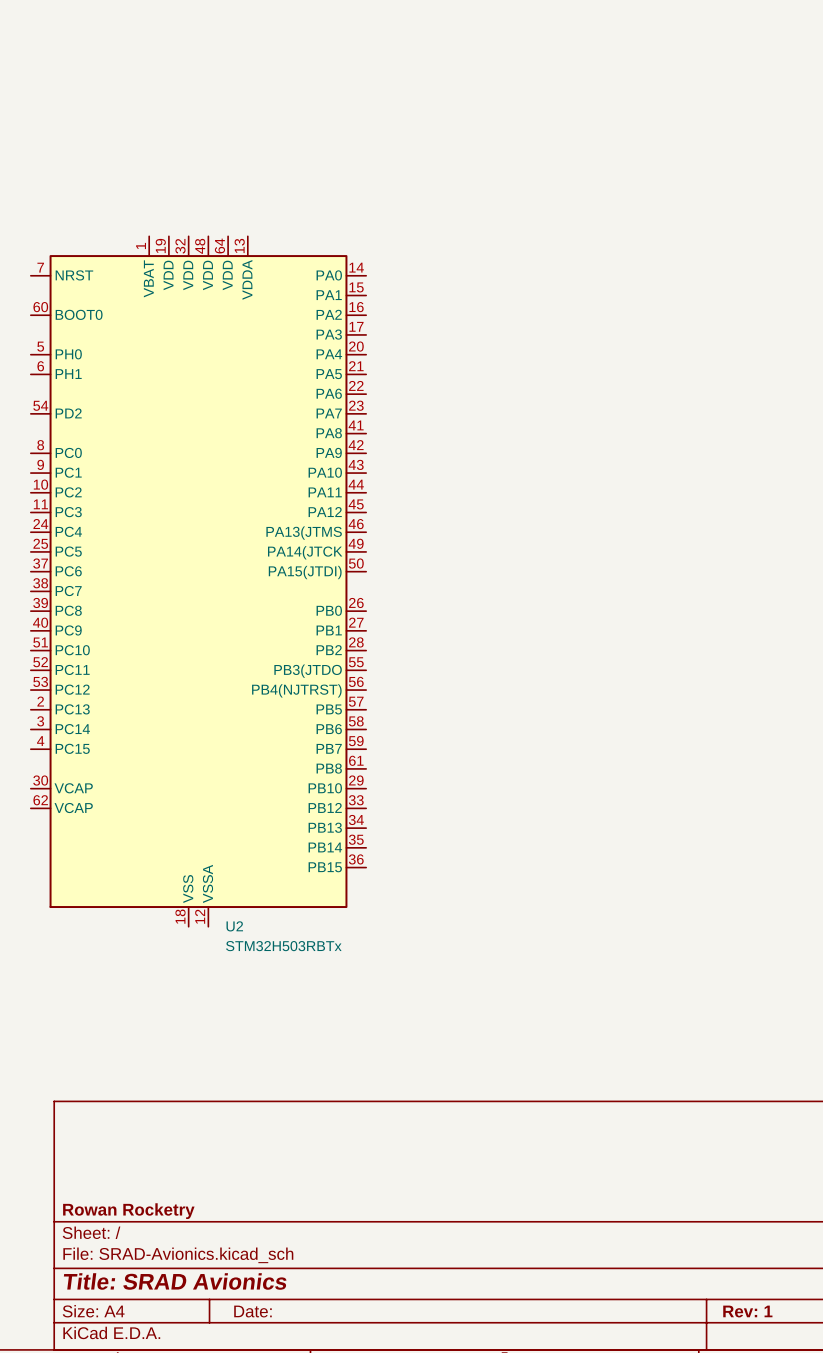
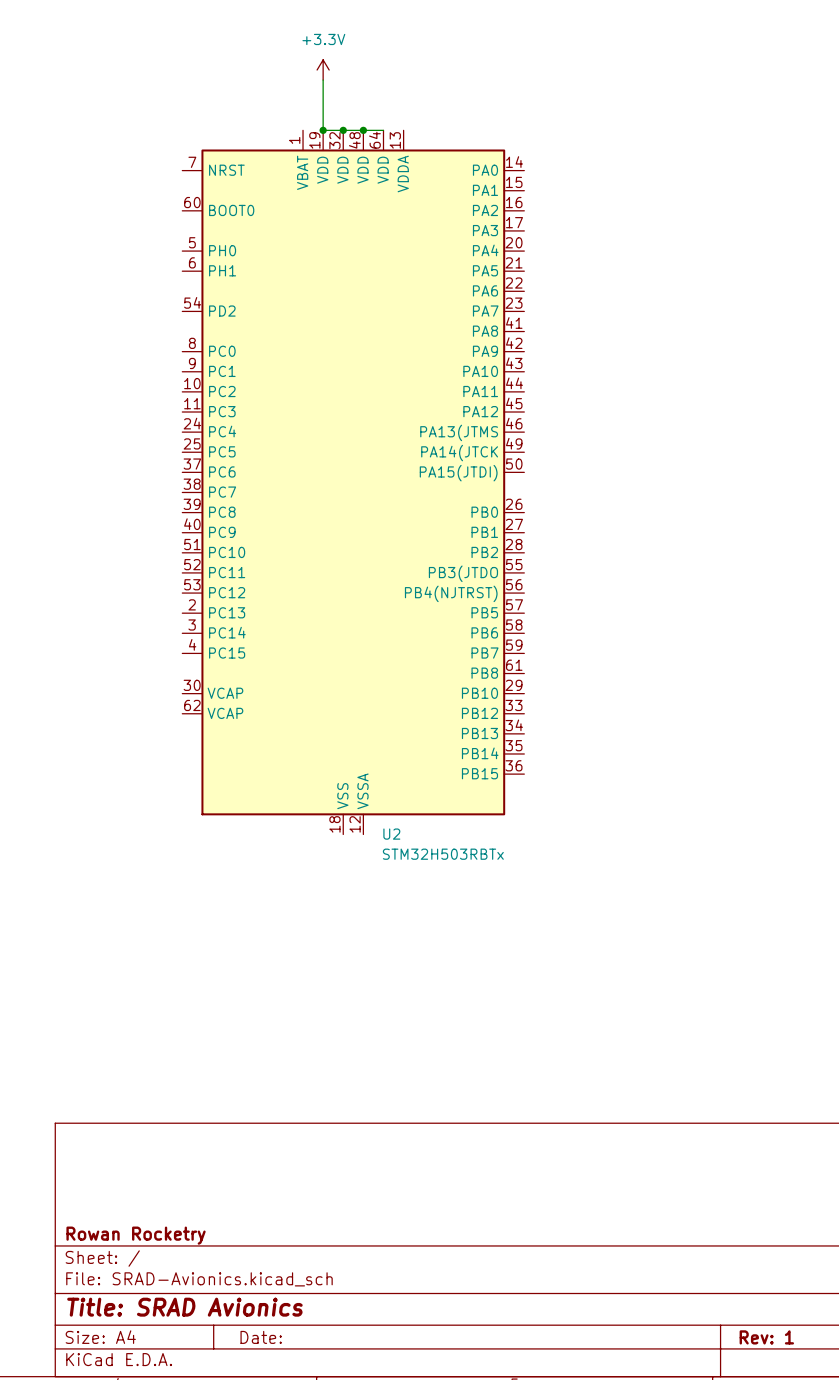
power symbol: none -> +3.3V (323, 70)
wire: none -> (323, 80) (323, 130) (383, 130)
junction: none -> (323, 130)
junction: none -> (343, 130)
junction: none -> (363, 130)
U2 position: (198, 581) -> (353, 482)

